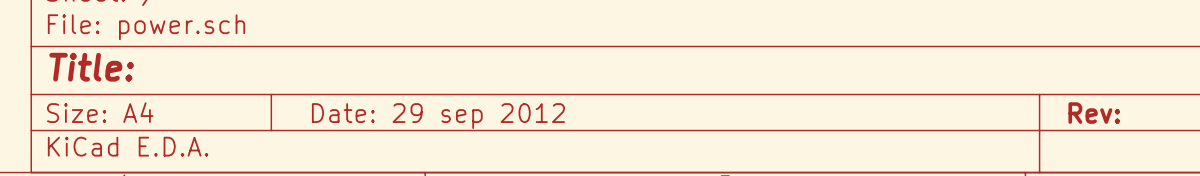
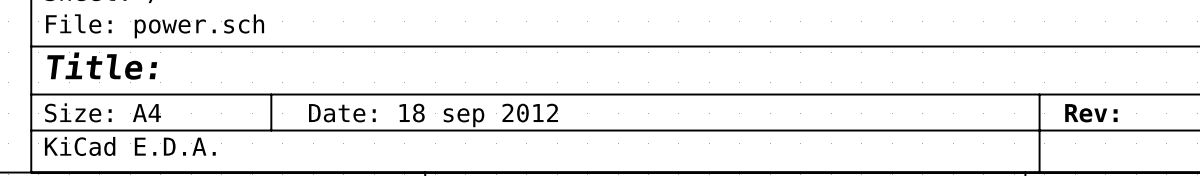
title block: Date: 29 sep 2012 (438, 116) -> Date: 18 sep 2012 (433, 115)

